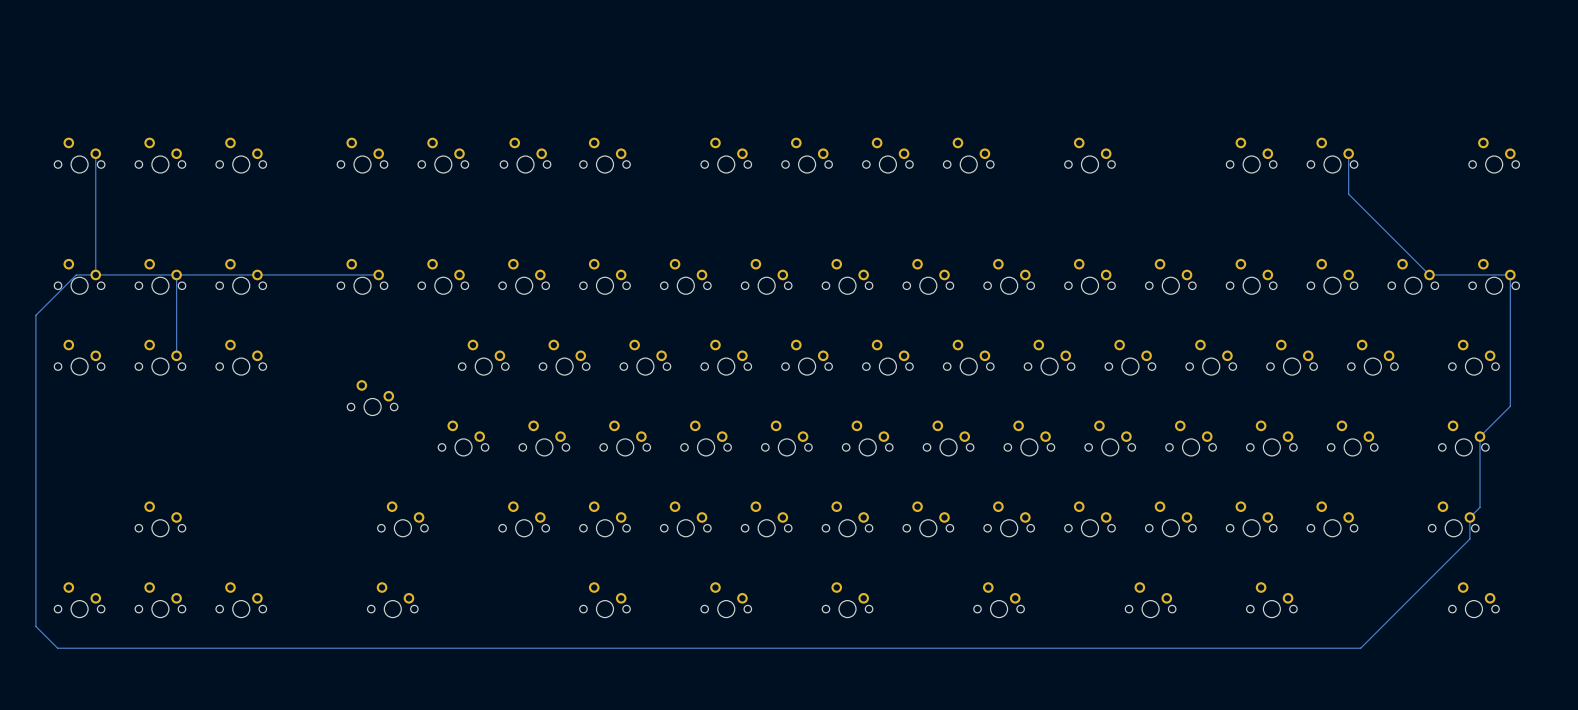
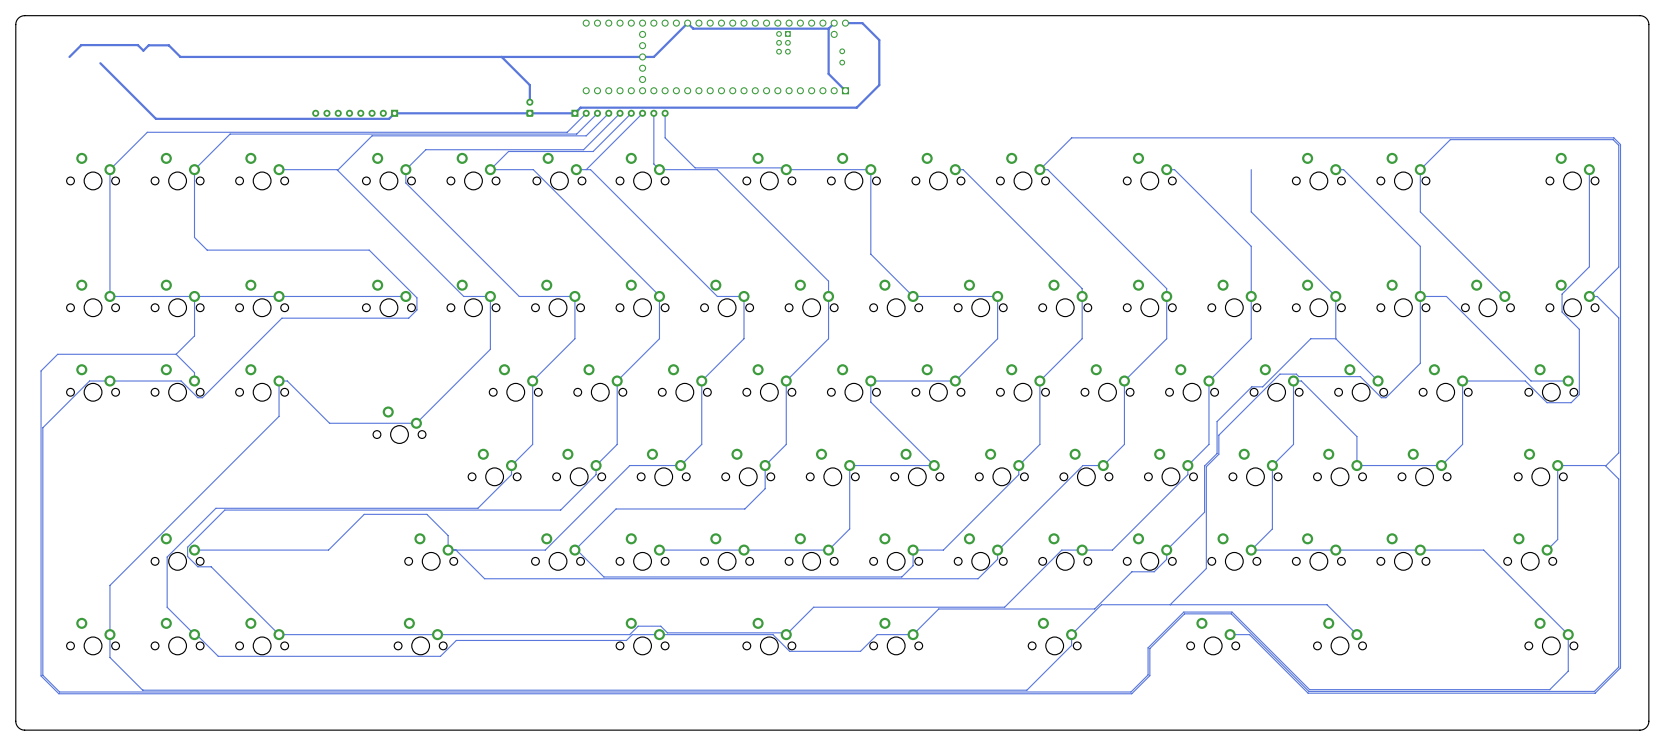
board edge: none -> (1639, 15) (20, 16) (15, 24) (16, 725) (24, 730) (1643, 729) (1648, 721) (1648, 24) (1646, 18) (1639, 15)
track: none -> (834, 23) (828, 28)
track: none -> (845, 23) (862, 23) (879, 40) (879, 85) (856, 107) (580, 107) (574, 113) (394, 113) (389, 118) (155, 118) (100, 63)
track: none -> (828, 28) (693, 28) (687, 23) (653, 56) (180, 56) (168, 45) (148, 45) (143, 50) (137, 45) (81, 45) (69, 56)
track: none -> (828, 28) (828, 73) (845, 90)
track: none -> (501, 56) (529, 85) (529, 102)
part: none -> (715, 56)
part: none -> (529, 107)
part: none -> (355, 113)
track: none -> (586, 113) (567, 132) (147, 132) (109, 169)
track: none -> (597, 113) (576, 134) (230, 134) (194, 169) (194, 237) (207, 250) (369, 250) (416, 297) (416, 309) (408, 318) (281, 318) (202, 397) (197, 397) (181, 381) (89, 381) (42, 427) (42, 675) (59, 691) (1131, 691) (1148, 674) (1148, 647) (1183, 612) (1232, 612) (1309, 689) (1549, 689) (1568, 671) (1568, 634) (1483, 550) (1251, 550) (1272, 528) (1272, 465) (1293, 444) (1293, 381) (1301, 381) (1356, 436) (1356, 465) (1441, 465) (1462, 444) (1462, 381) (1525, 381) (1547, 402) (1571, 402) (1579, 394) (1579, 329) (1562, 312) (1562, 294) (1589, 266) (1589, 169)
track: none -> (608, 113) (586, 135) (372, 135) (337, 170)
track: none -> (620, 113) (583, 149) (425, 149) (405, 169) (405, 183) (519, 296) (574, 296) (574, 338) (532, 381) (532, 444) (511, 465) (511, 474) (477, 508) (215, 508) (167, 557) (167, 607) (218, 656) (440, 656) (456, 640) (626, 640) (632, 634) (772, 634) (789, 651) (860, 651) (877, 634) (913, 634) (938, 608) (1094, 608) (1131, 571) (1154, 571) (1166, 559) (1166, 550) (1204, 512) (1204, 466) (1217, 453) (1217, 421) (1251, 386) (1262, 386) (1310, 338) (1335, 338)
part: none -> (620, 113)
track: none -> (631, 113) (593, 151) (508, 151) (490, 169) (533, 169) (659, 295) (659, 338) (617, 381) (617, 444) (596, 465) (596, 474) (560, 510) (224, 510) (187, 547) (187, 556) (197, 566) (211, 566) (279, 634) (629, 634) (638, 626) (660, 626) (667, 632) (784, 632) (786, 634) (813, 607) (1004, 607) (1061, 550) (1112, 550) (1187, 474) (1187, 465) (1208, 444) (1208, 381) (1251, 338) (1251, 246) (1174, 169) (1166, 169)
track: none -> (642, 113) (586, 169)
track: none -> (653, 113) (653, 164) (659, 169) (717, 169) (828, 281) (828, 338) (786, 381) (786, 444) (765, 465) (765, 488) (744, 508) (616, 508) (574, 550) (603, 576) (901, 576) (913, 565) (913, 550) (943, 550) (1018, 474) (1018, 465) (1039, 444) (1039, 381) (1082, 338) (1082, 288) (963, 169) (955, 169)
track: none -> (665, 113) (665, 137) (695, 167) (870, 169) (870, 254) (913, 296) (997, 296) (997, 338) (955, 381) (870, 381) (870, 402) (934, 465) (849, 465) (849, 528) (828, 550) (659, 550)
track: none -> (279, 169) (336, 169) (463, 296) (490, 296) (490, 349) (416, 423) (329, 423) (287, 381) (279, 381) (279, 416) (109, 585) (109, 657) (142, 690)
track: none -> (576, 169) (590, 169) (717, 296) (744, 296) (744, 338) (701, 381) (701, 444) (680, 465) (629, 465) (545, 550) (448, 550) (448, 535) (426, 514) (364, 514) (328, 550) (194, 550)
track: none -> (1251, 169) (1251, 211) (1335, 296) (1335, 338)
track: none -> (1335, 169) (1343, 169) (1420, 246) (1420, 363) (1385, 397) (1381, 397) (1360, 376) (1298, 376) (1296, 374) (1279, 374) (1218, 435) (1218, 454) (1206, 466) (1206, 568) (1170, 604)
track: (95, 274) (76, 274) (35, 315) (35, 626) (57, 648) (1360, 648) (1469, 539) (1469, 517) -> none
track: none -> (1420, 296) (1446, 296) (1530, 381) (1568, 381)
track: (1429, 274) (1510, 274) (1510, 406) (1480, 436) -> (1420, 169) (1450, 139) (1613, 139) (1618, 145) (1618, 267) (1589, 296) (1597, 296) (1618, 317) (1618, 452) (1606, 465) (1557, 465)
track: (176, 312) (176, 355) -> (176, 354) (194, 372) (194, 381)
track: none -> (194, 335) (176, 354)
track: none -> (1335, 338) (1378, 381)
track: none -> (176, 354) (57, 354) (41, 370) (41, 675) (58, 693) (1131, 693) (1149, 675) (1149, 648) (1184, 613) (1231, 613) (1308, 691) (1594, 691) (1618, 667) (1618, 479) (1605, 465)
track: none -> (455, 550) (484, 578) (978, 578) (997, 559) (997, 550) (1082, 465) (1103, 465) (1124, 444) (1124, 381) (1166, 338) (1166, 288) (1047, 169) (1039, 169) (1071, 137) (1613, 137) (1620, 144) (1620, 667) (1595, 693) (1308, 693) (1249, 634) (1230, 634)
track: none -> (1356, 634) (1327, 604) (1101, 604) (1071, 634) (1071, 645) (1026, 690) (142, 690)

